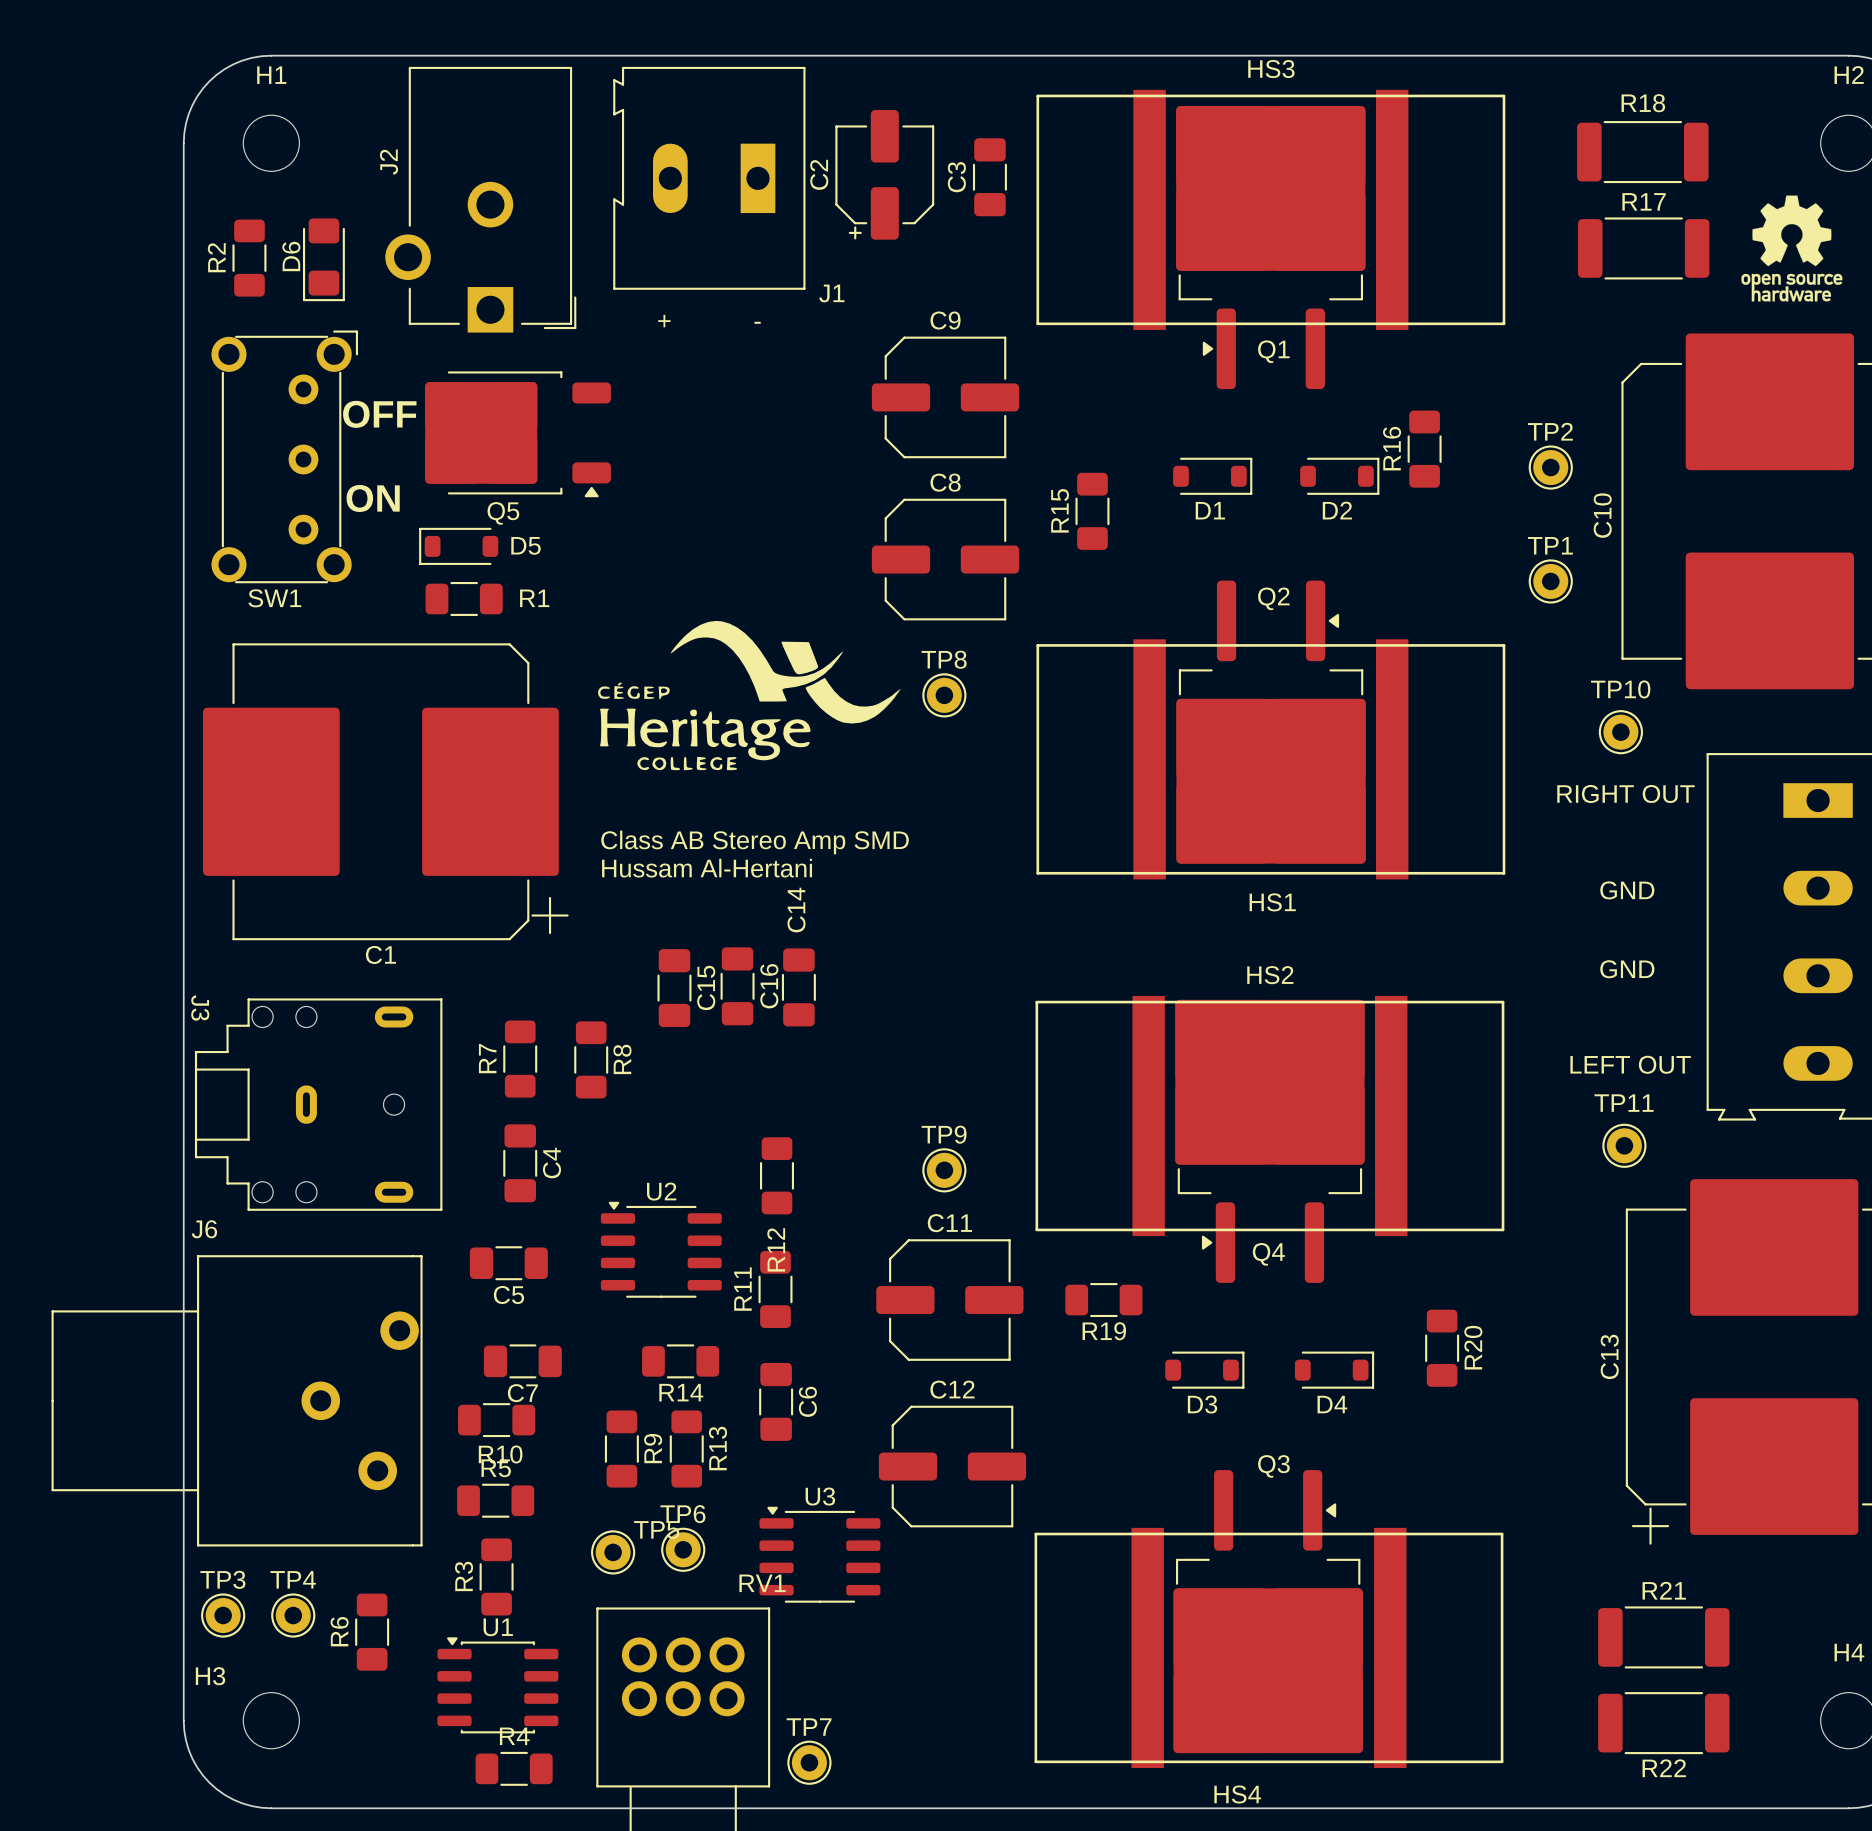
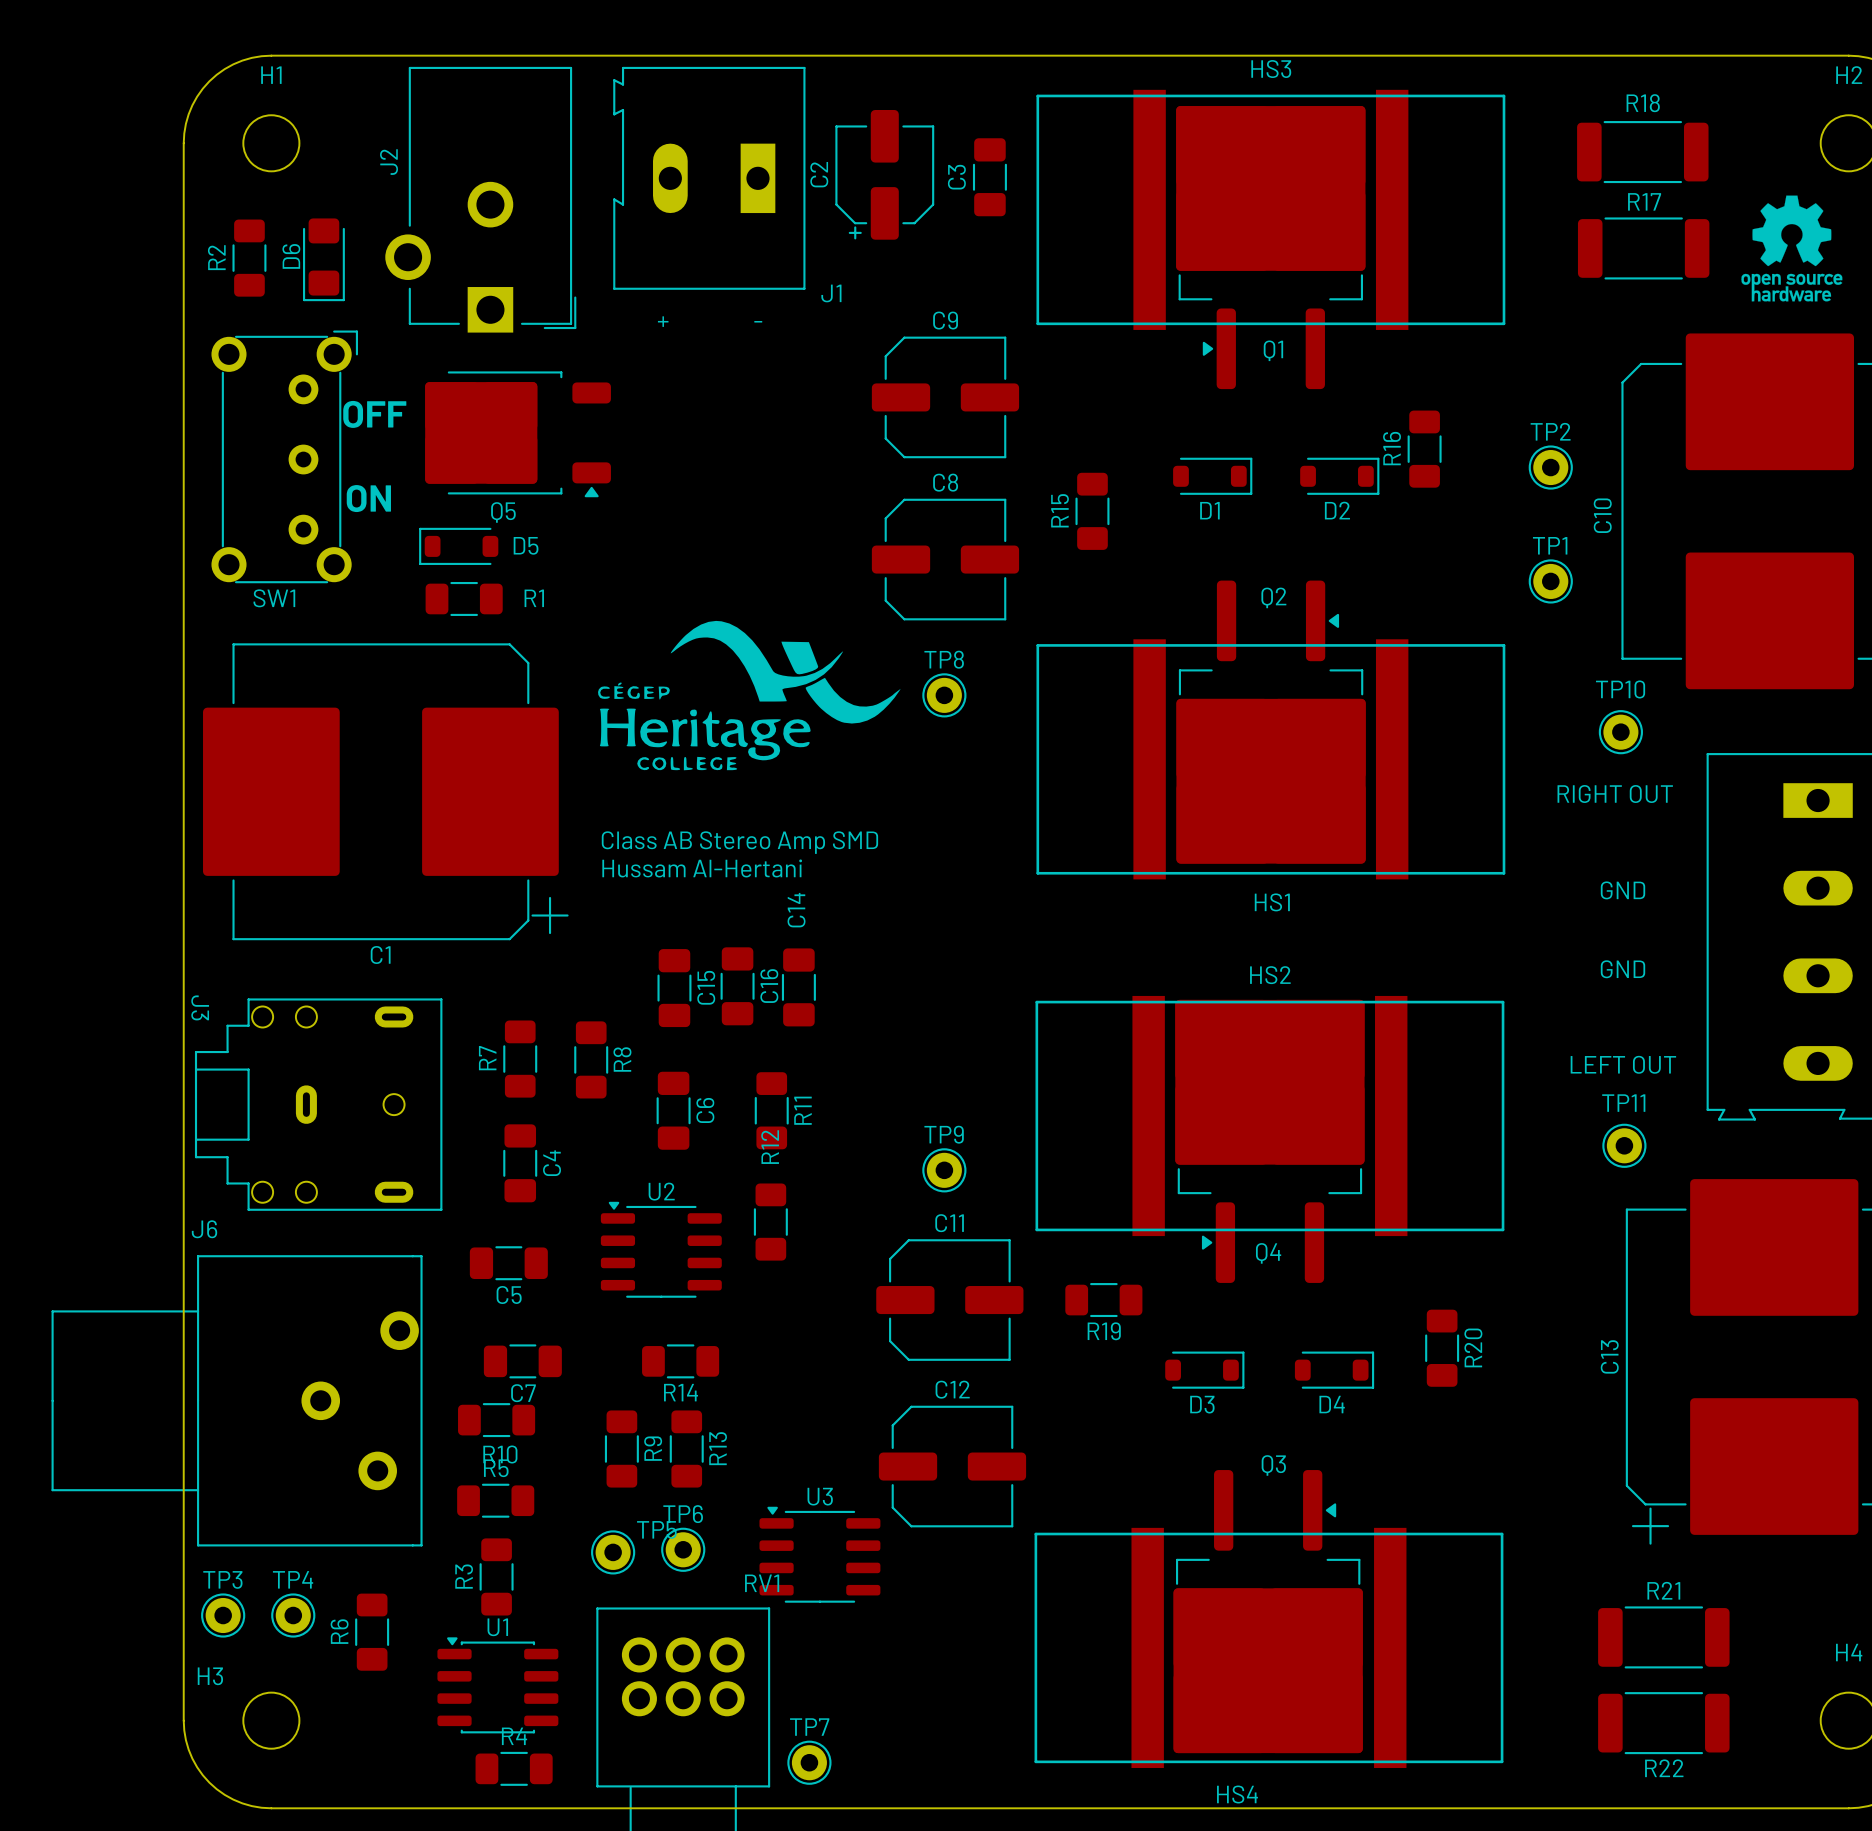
R12 position: (777, 1175) -> (770, 1222)
R12 name position: R12 (776, 1249) -> R12 (770, 1147)
R11 name position: R11 (742, 1289) -> R11 (802, 1110)
R11 position: (775, 1289) -> (771, 1110)
C6 position: (776, 1401) -> (673, 1110)

